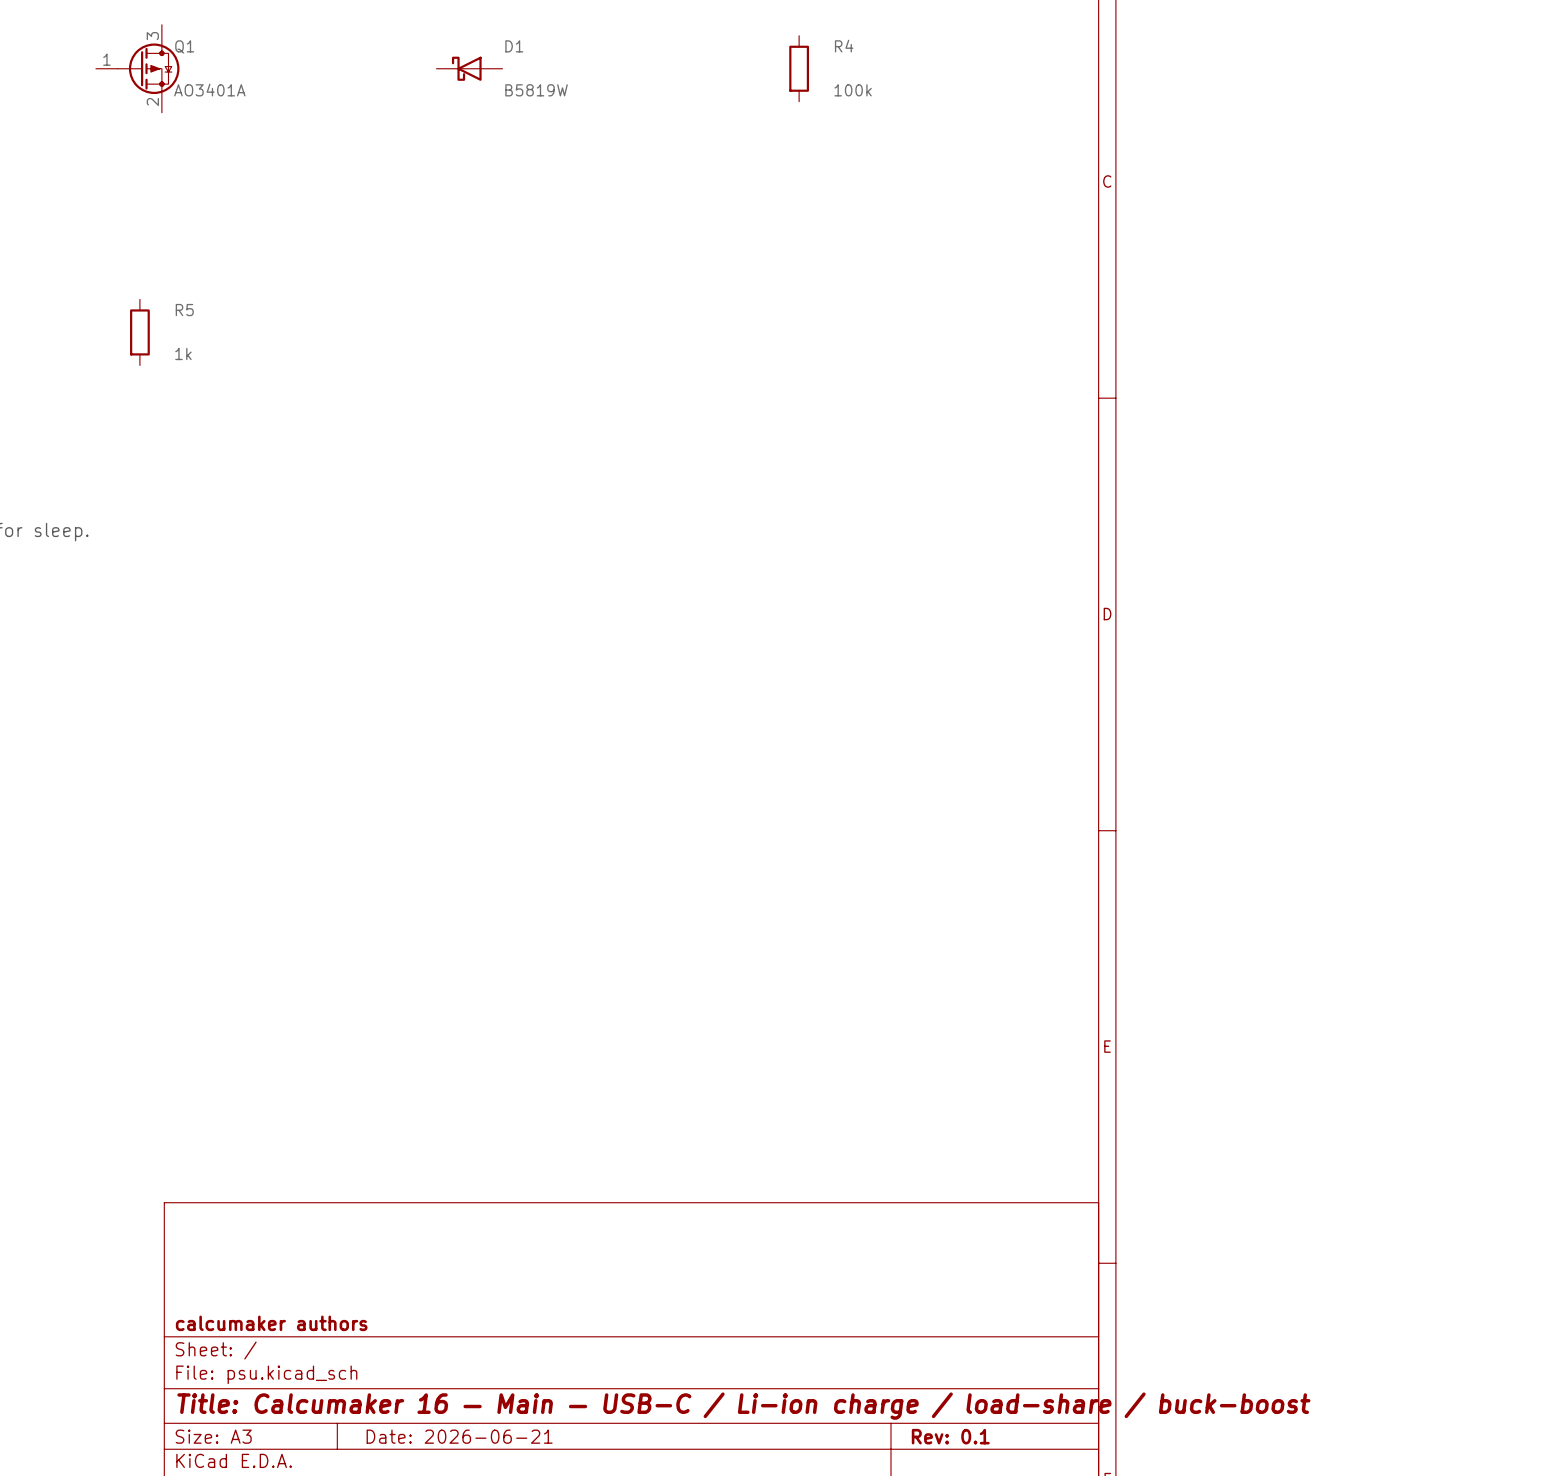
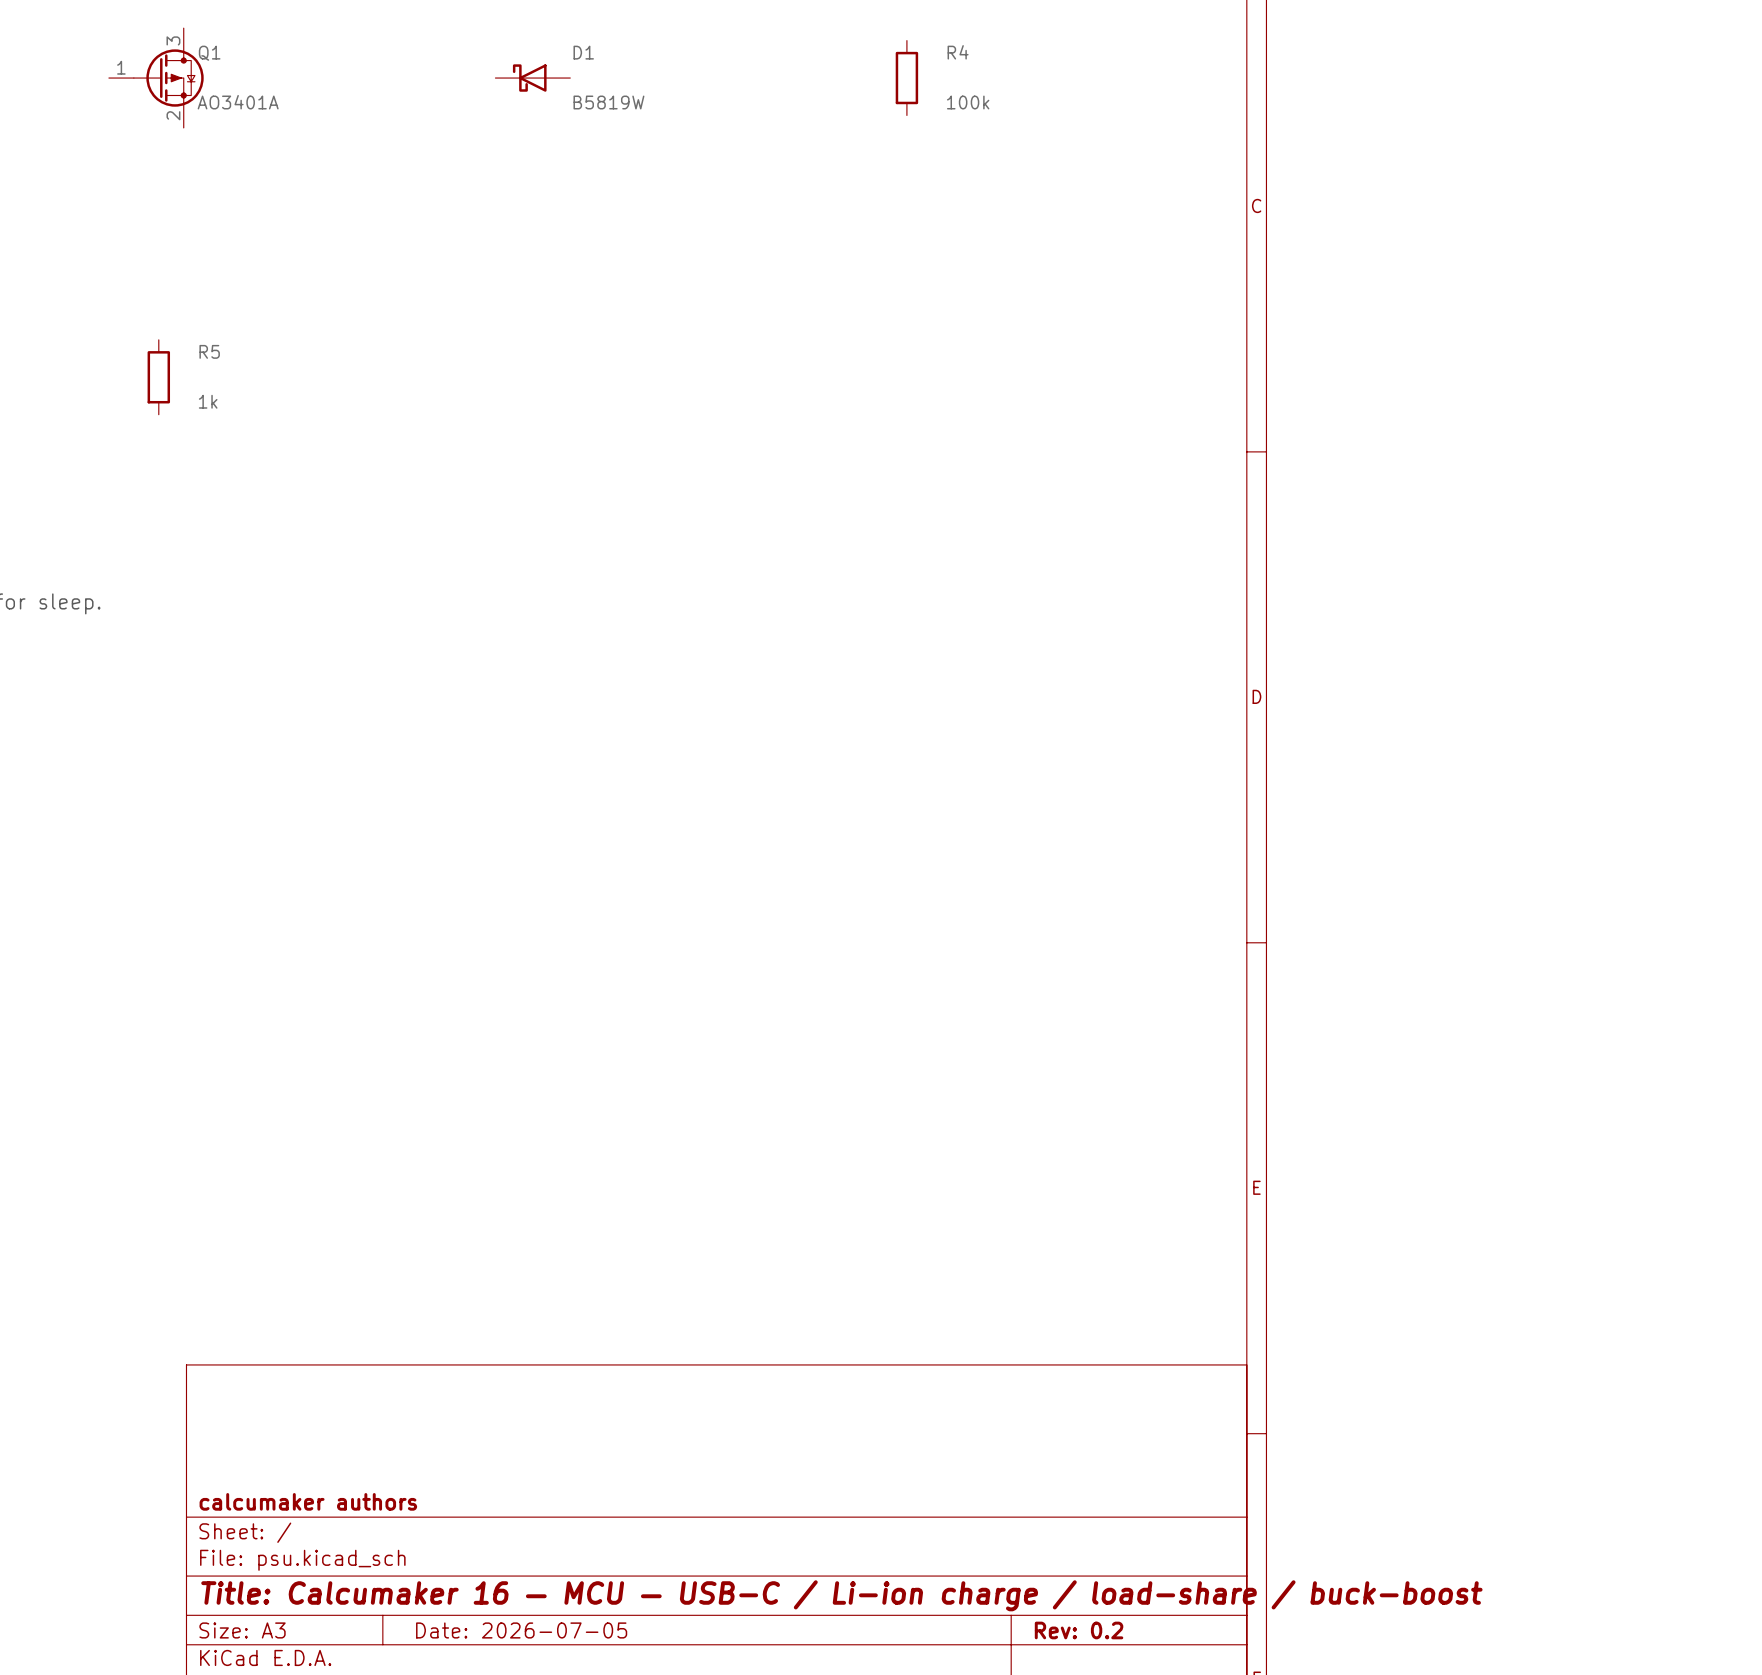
title block: Title: Calcumaker 16 — Main — USB-C / Li-ion charge / load-share / buck-boost (743, 1406) -> Title: Calcumaker 16 — MCU — USB-C / Li-ion charge / load-share / buck-boost (841, 1595)
title block: Date: 2026-06-21 (459, 1436) -> Date: 2026-07-05 (521, 1630)
title block: Rev: 0.1 (950, 1436) -> Rev: 0.2 (1079, 1630)

